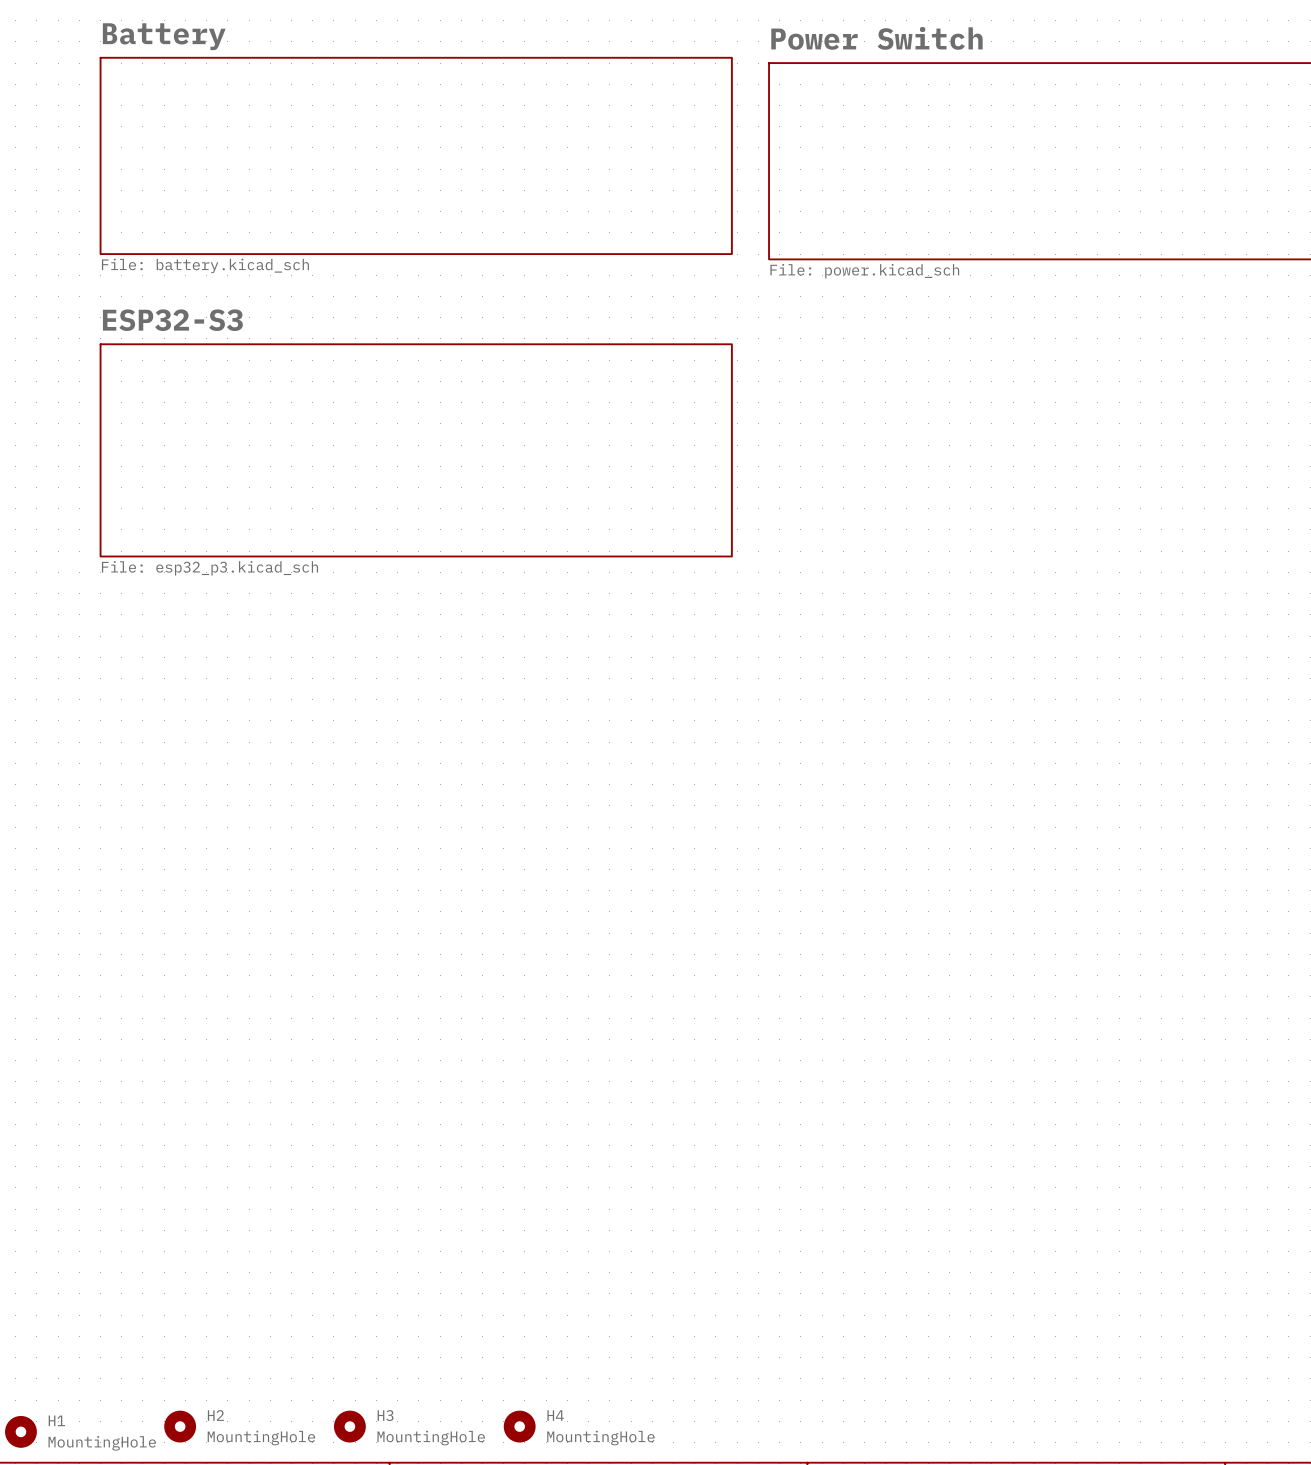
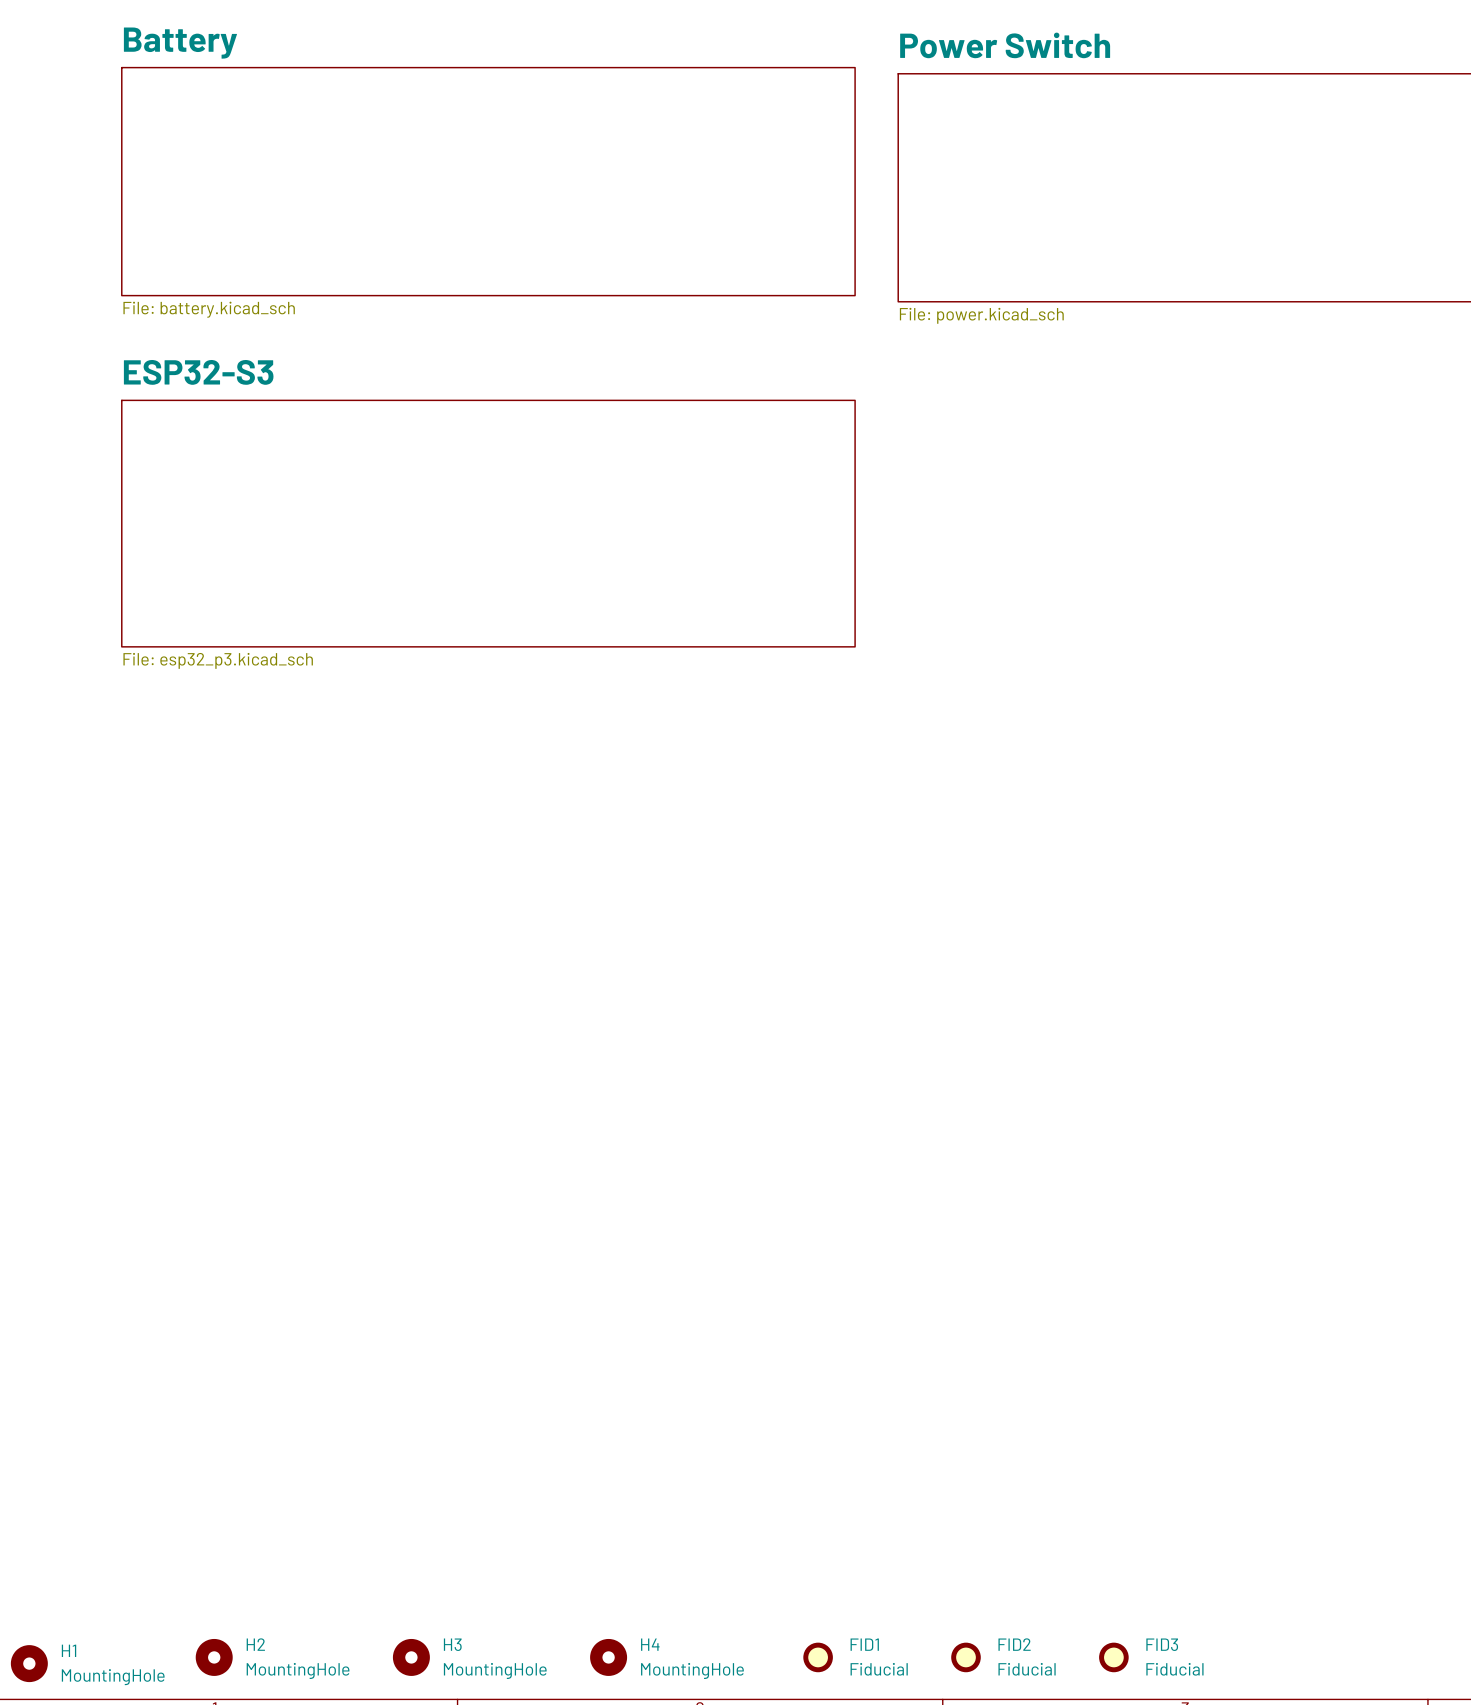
FID1: none -> Fiducial (818, 1657)
FID2: none -> Fiducial (966, 1657)
FID3: none -> Fiducial (1113, 1657)

